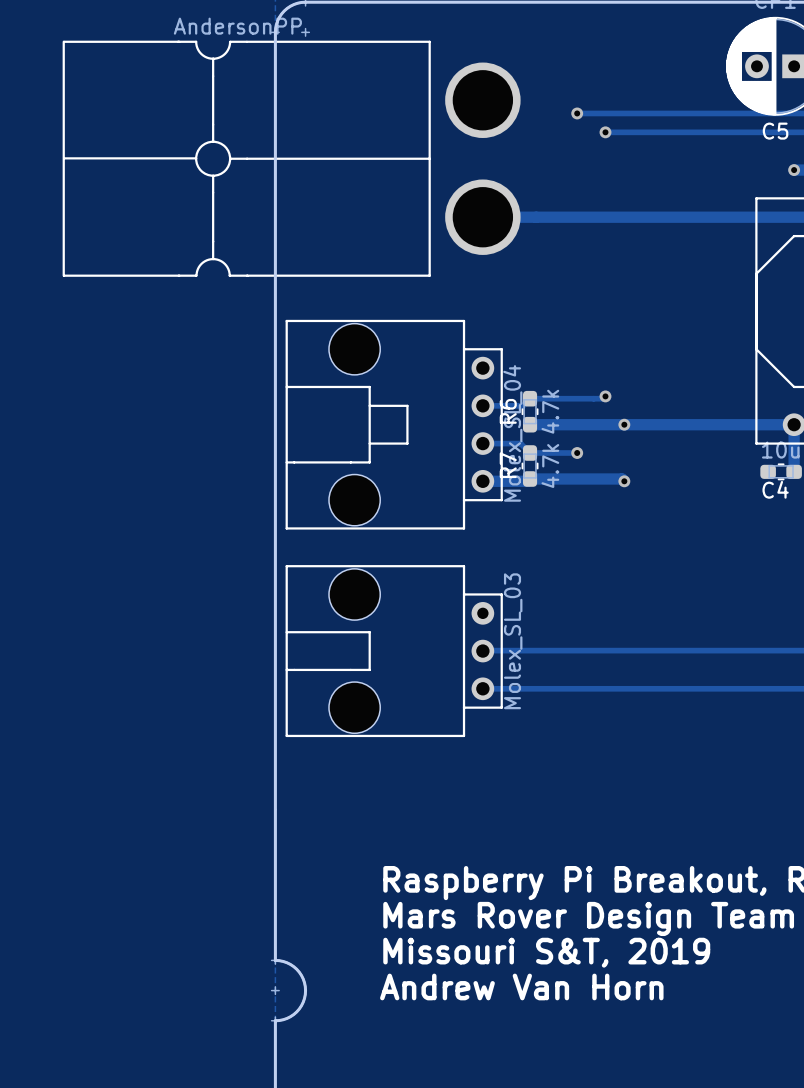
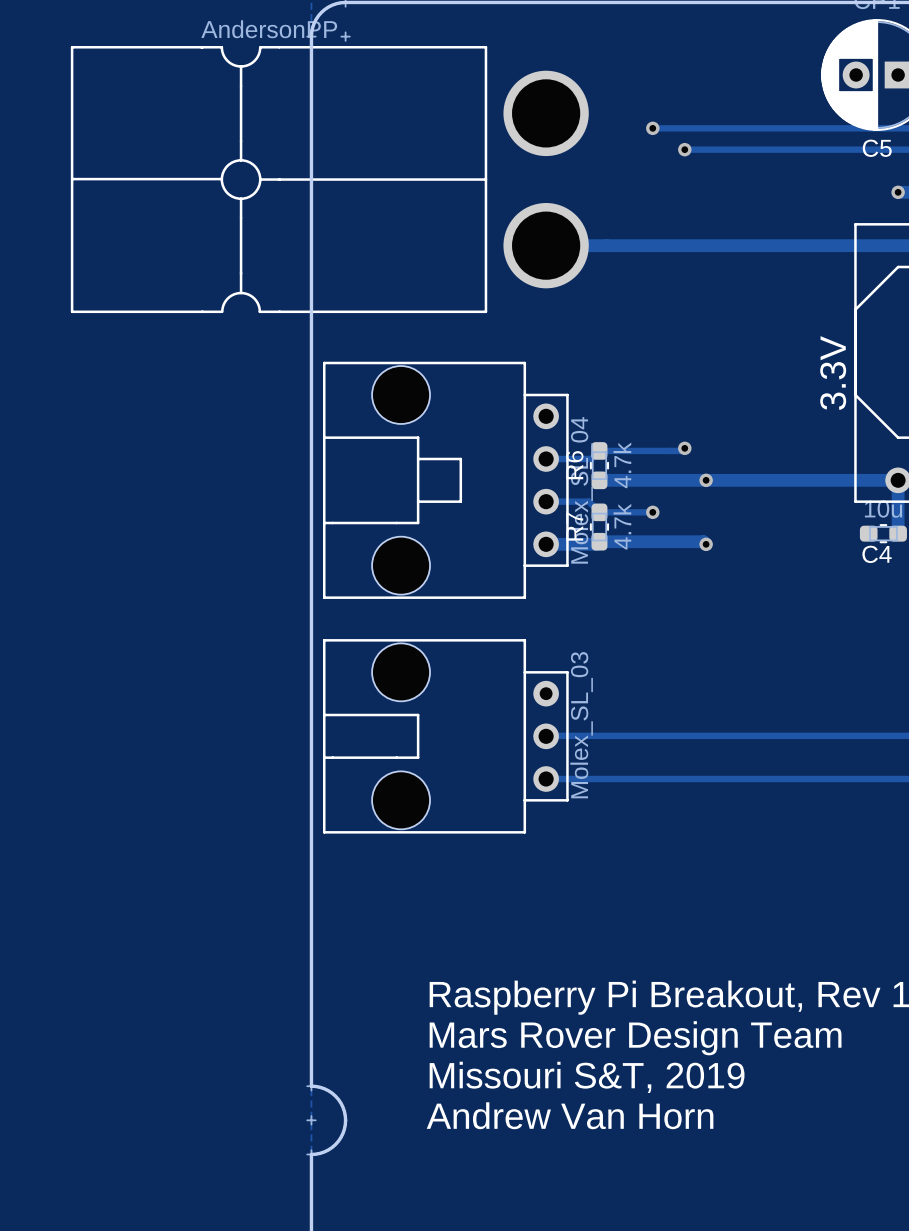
text: none -> 3.3V (833, 373)

